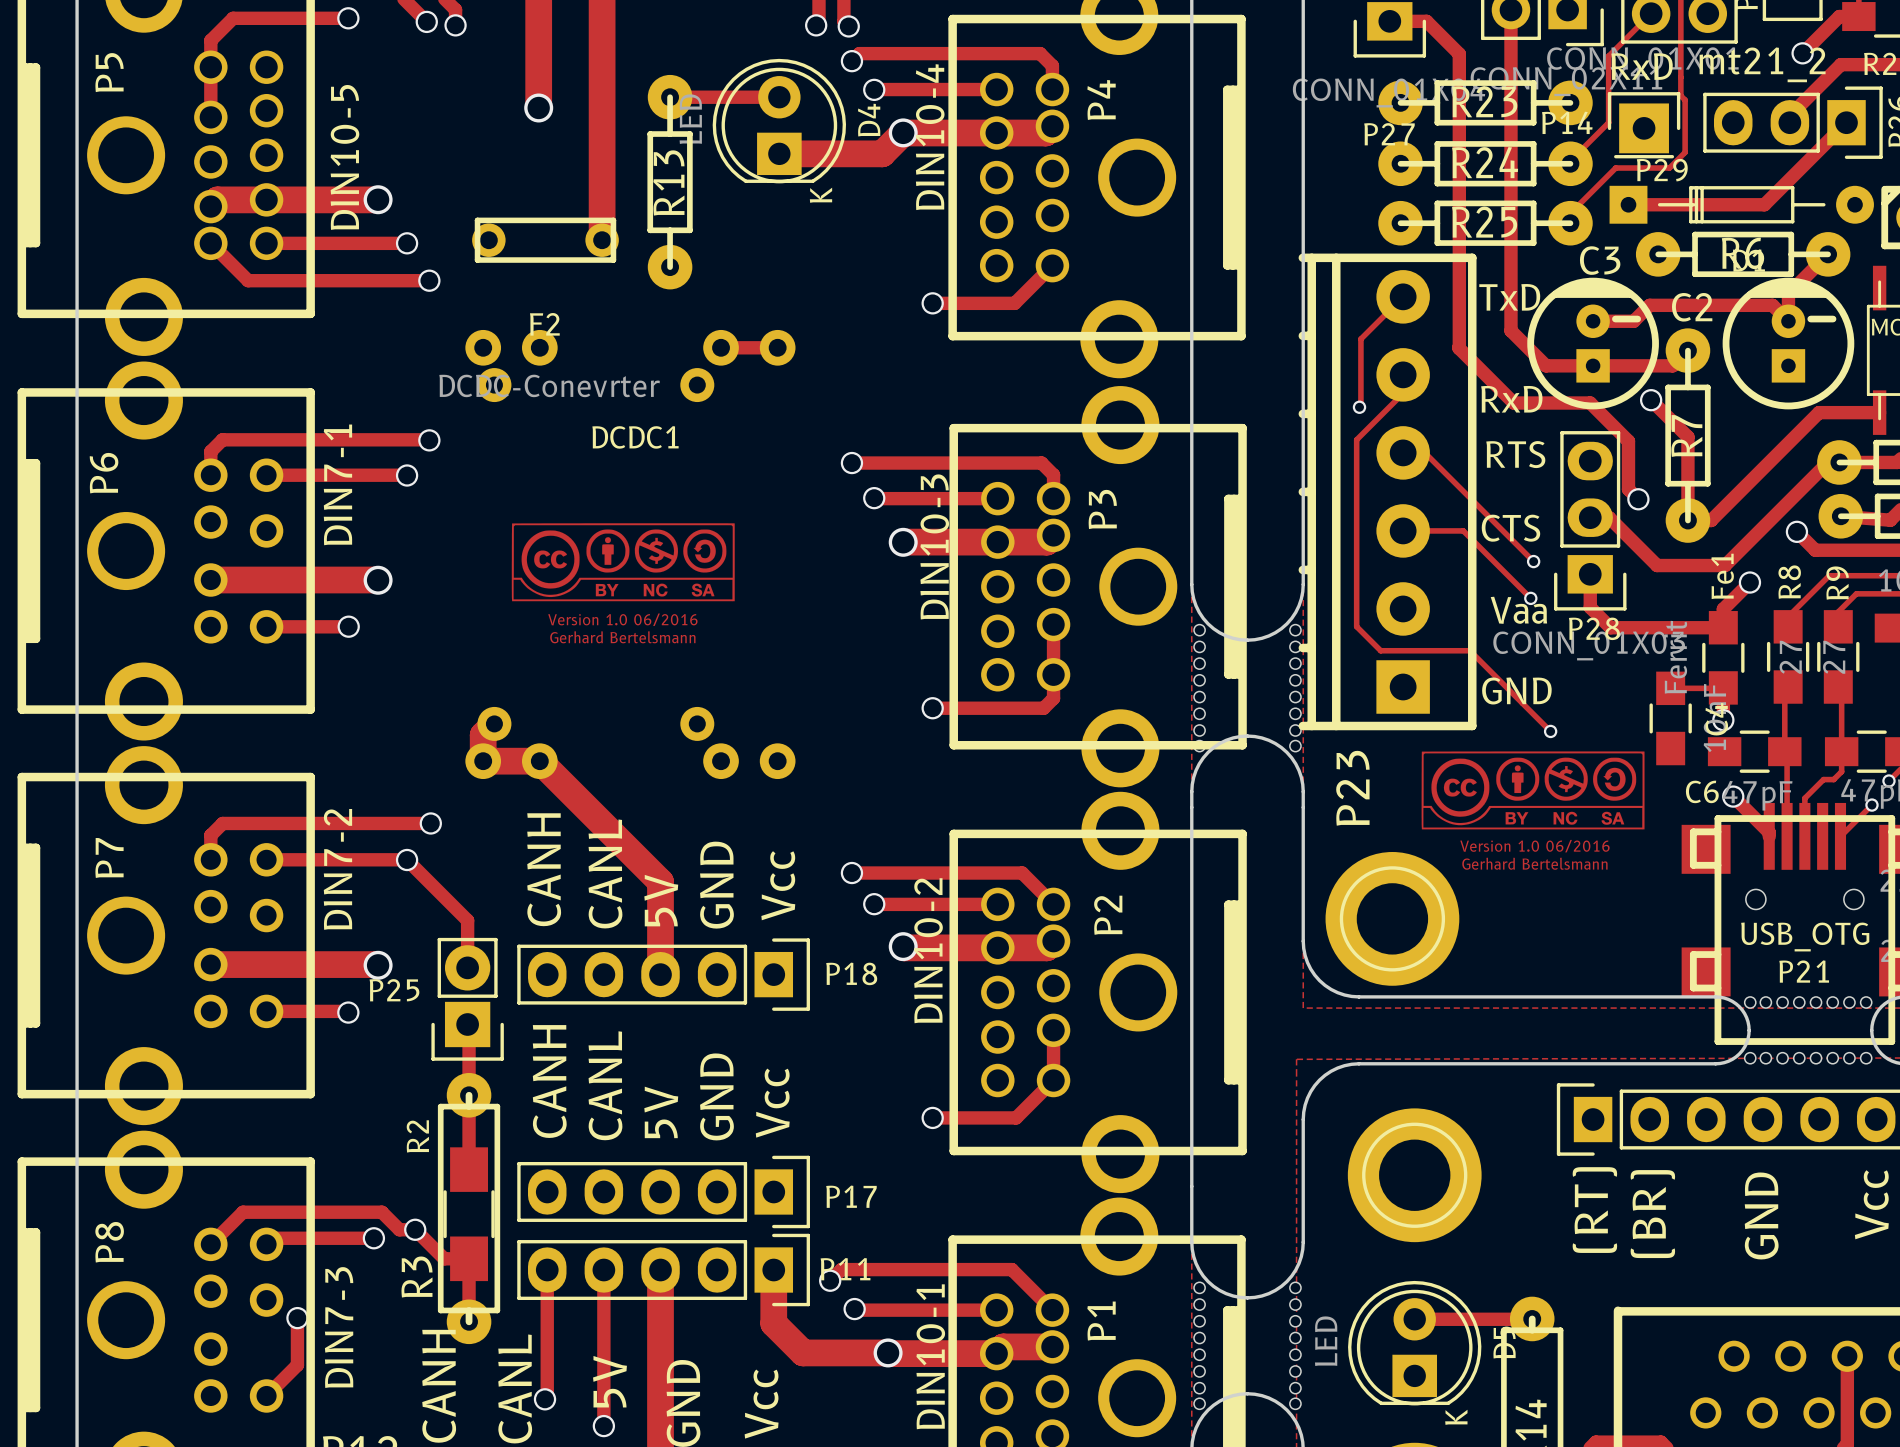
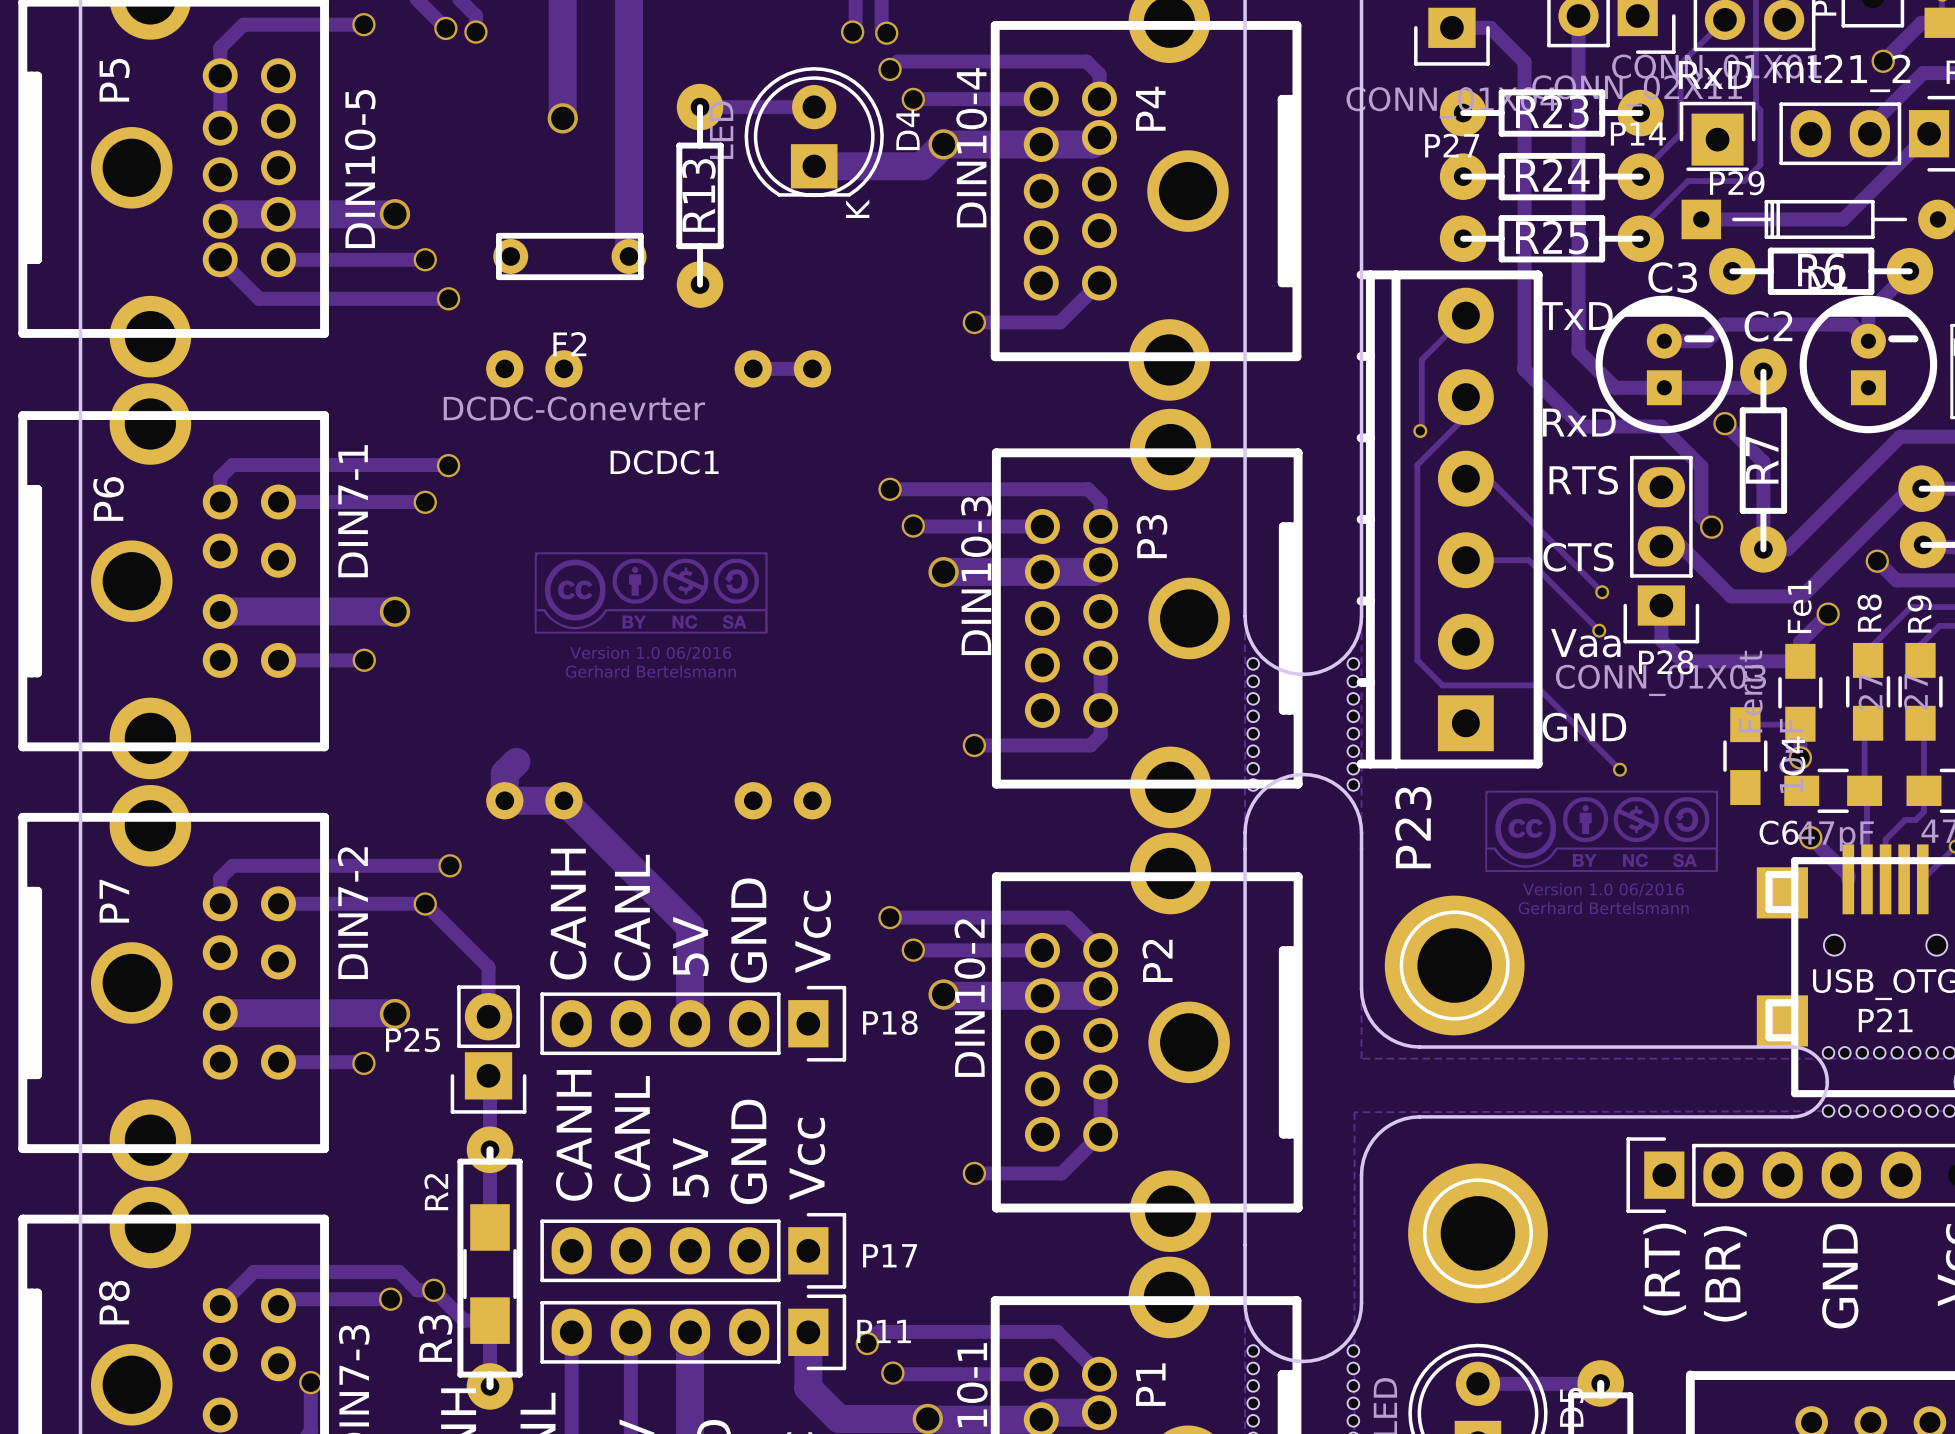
DCDC1 footprint: [465, 329, 796, 780] -> [486, 350, 832, 820]

